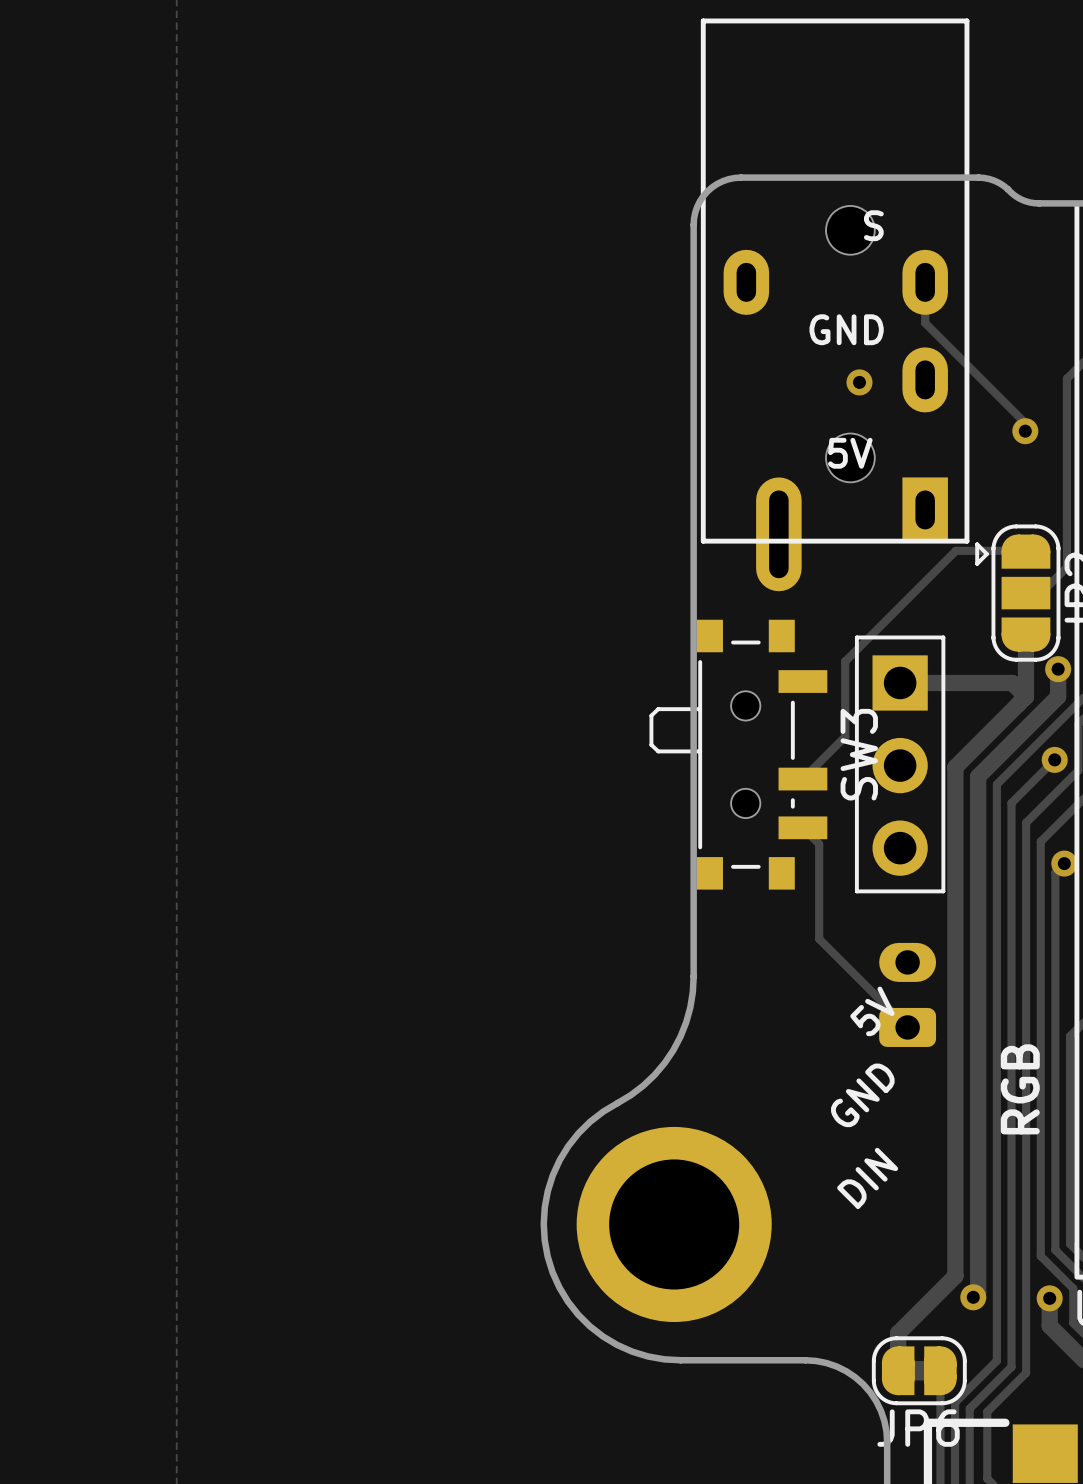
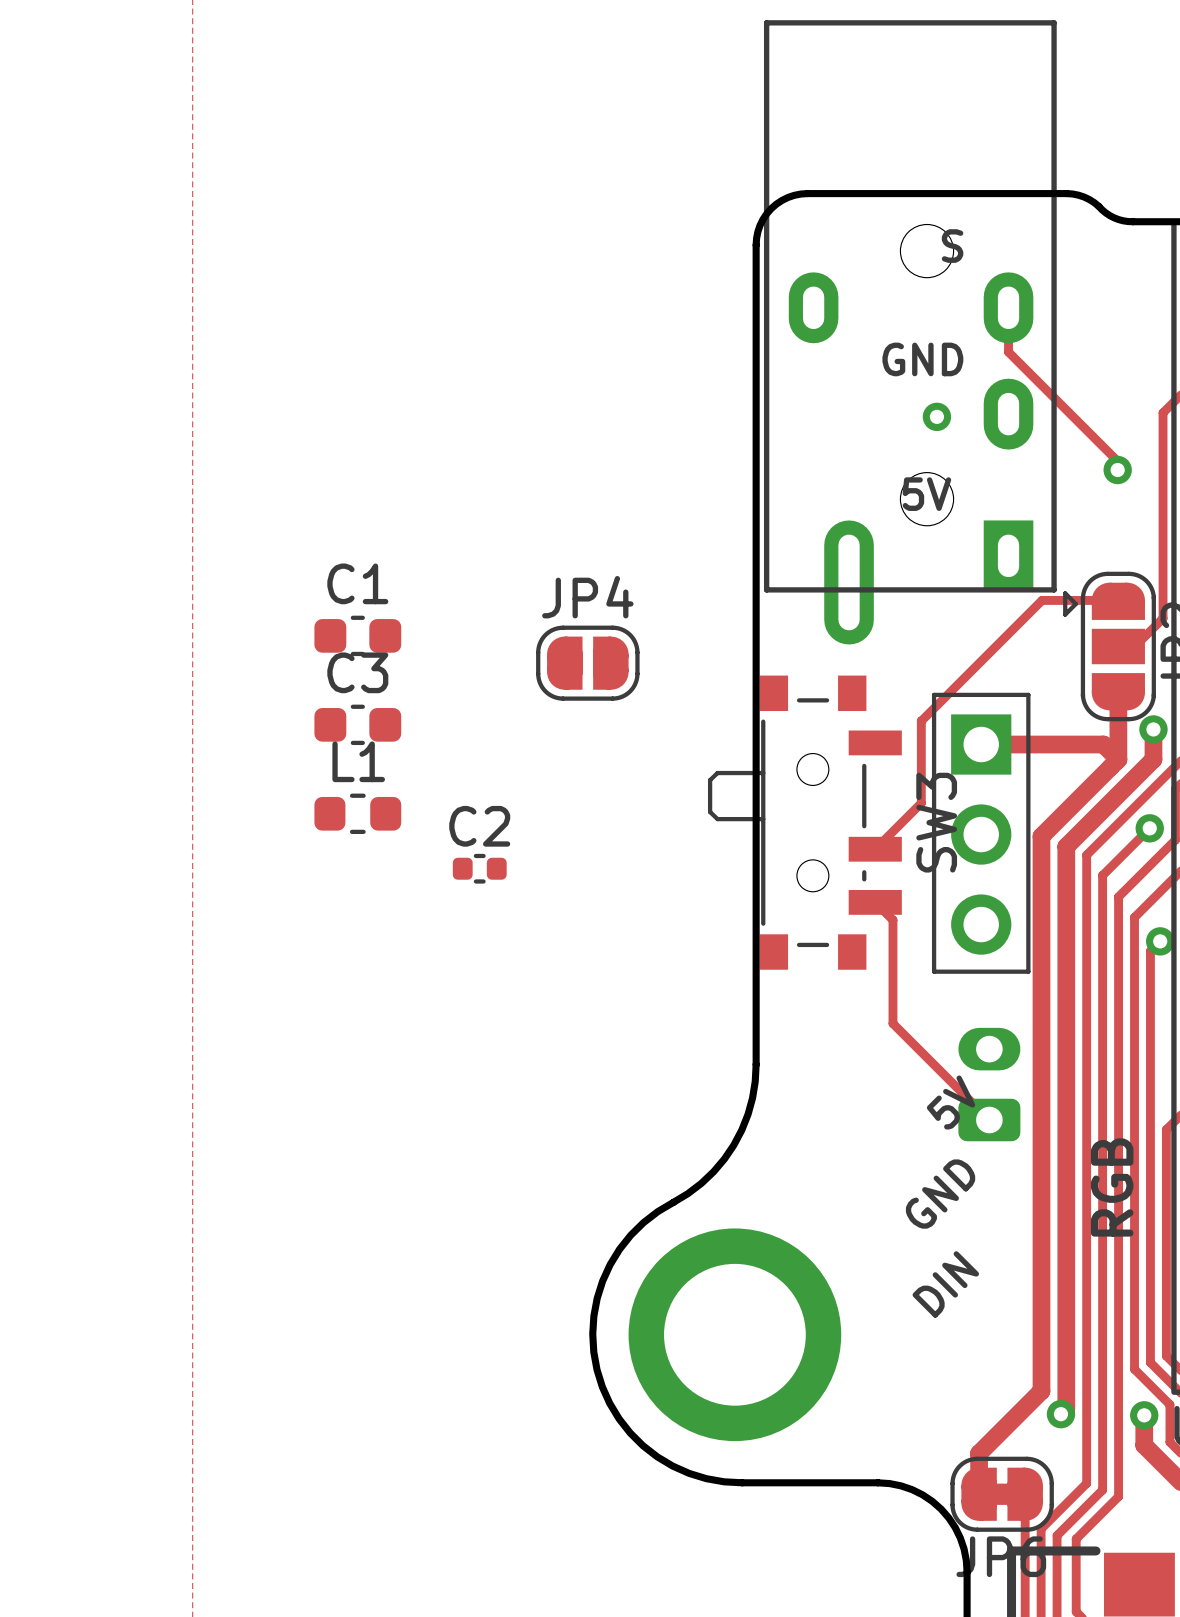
C1: none -> (357, 635)
JP4: none -> (587, 663)
C3: none -> (357, 724)
L1: none -> (357, 813)
C2: none -> (479, 868)

